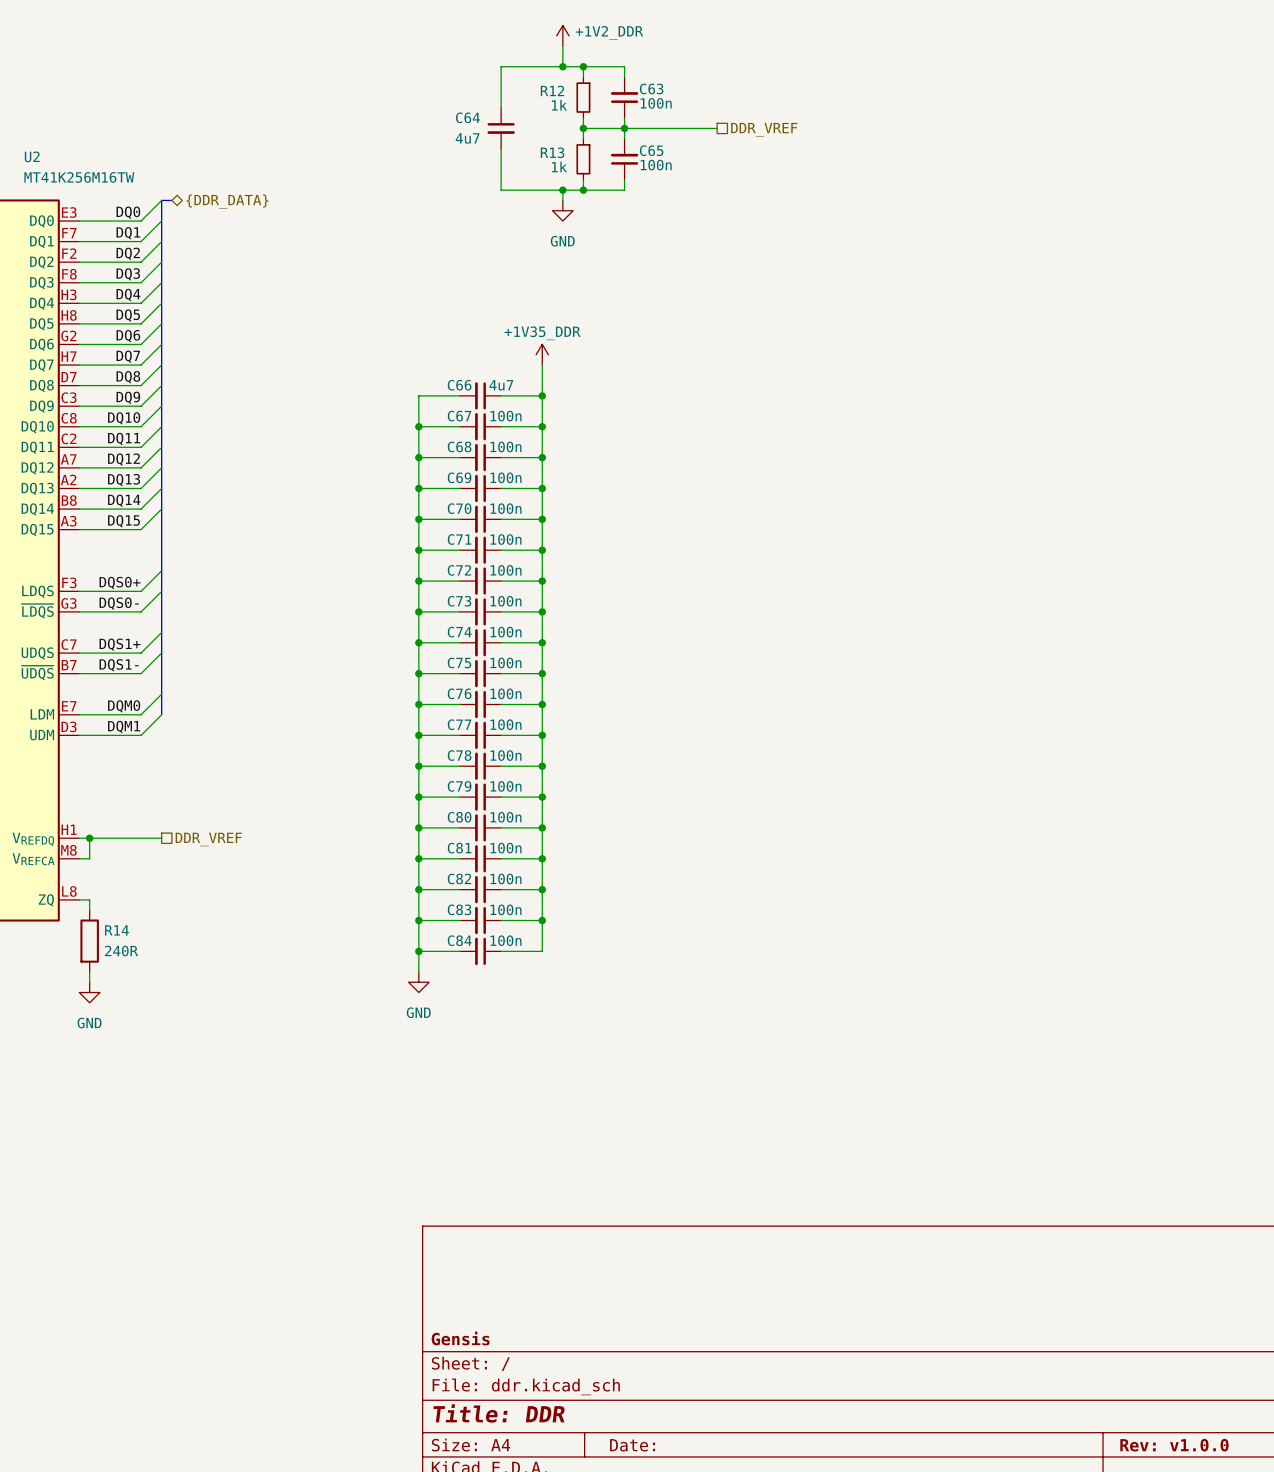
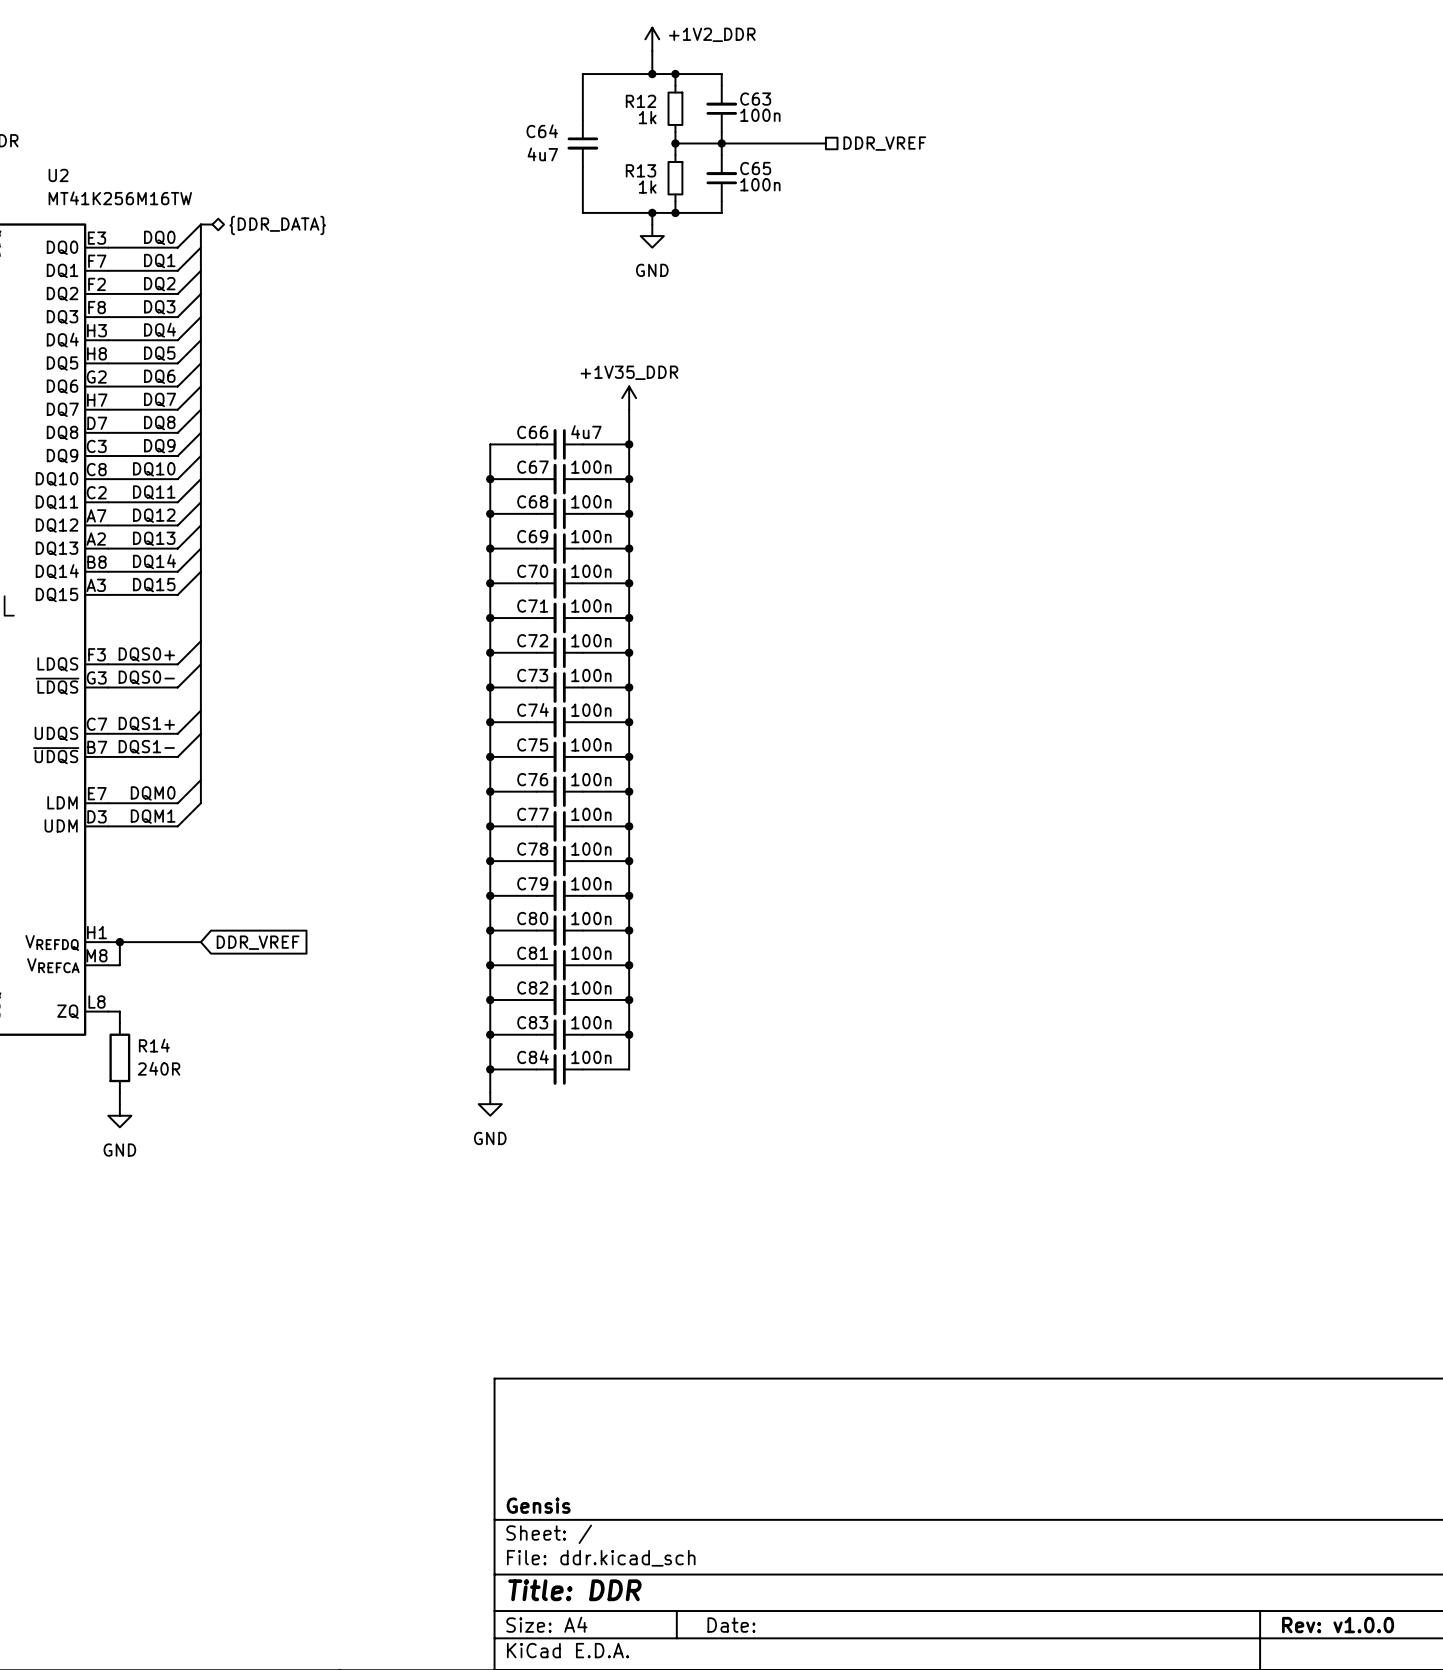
global label: none -> DDR_VREF (258, 942)
hierarchical label: DDR_VREF (208, 839) -> none

